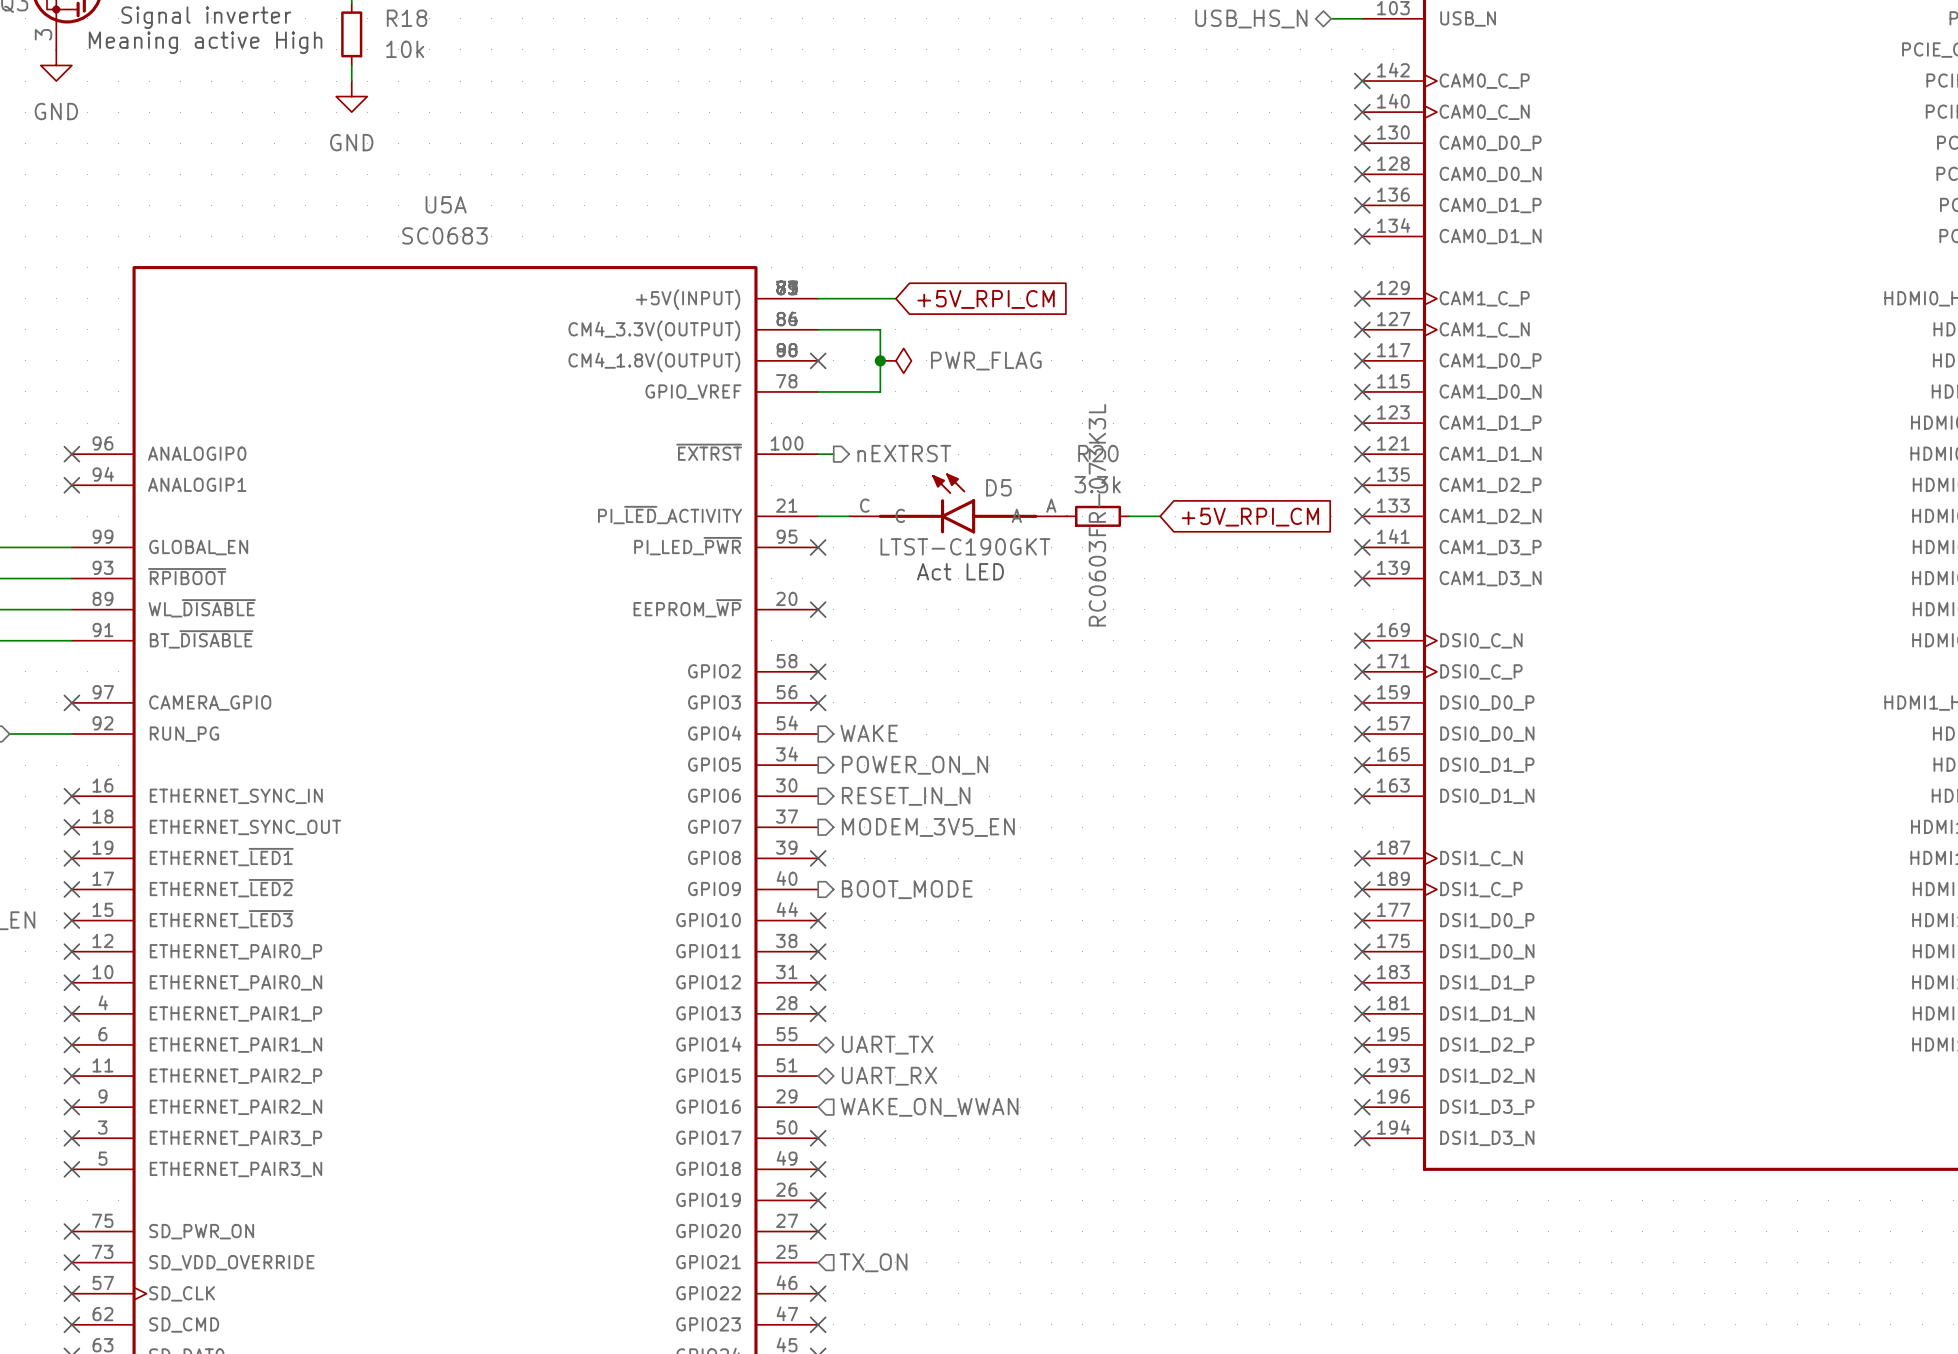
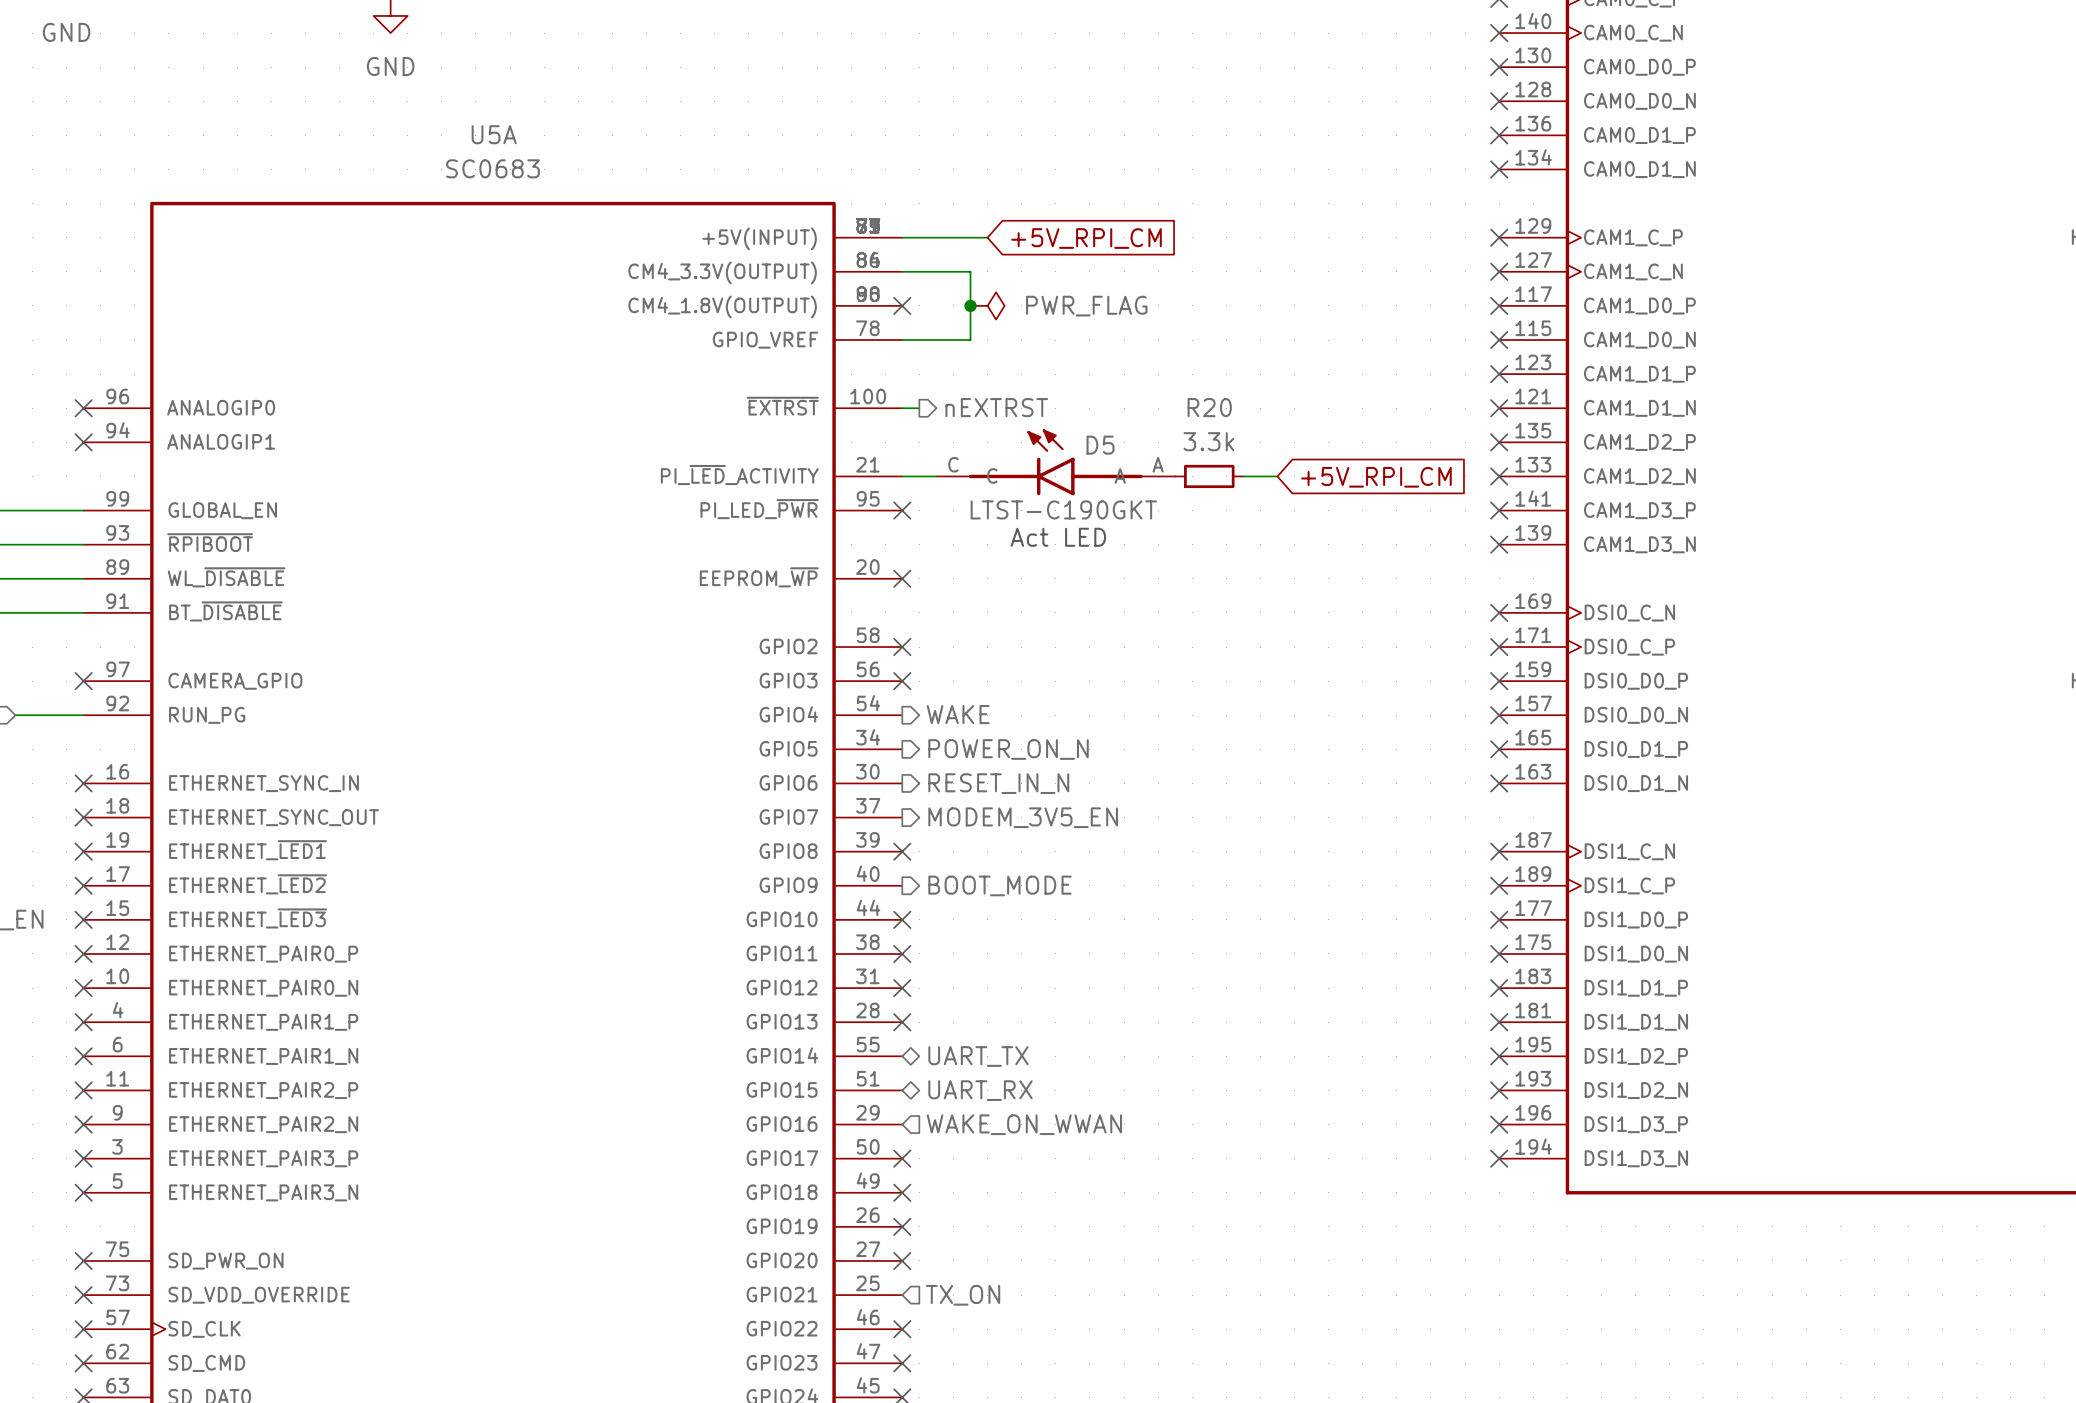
R20 text: RC0603FR-073K3L (1097, 515) -> none

